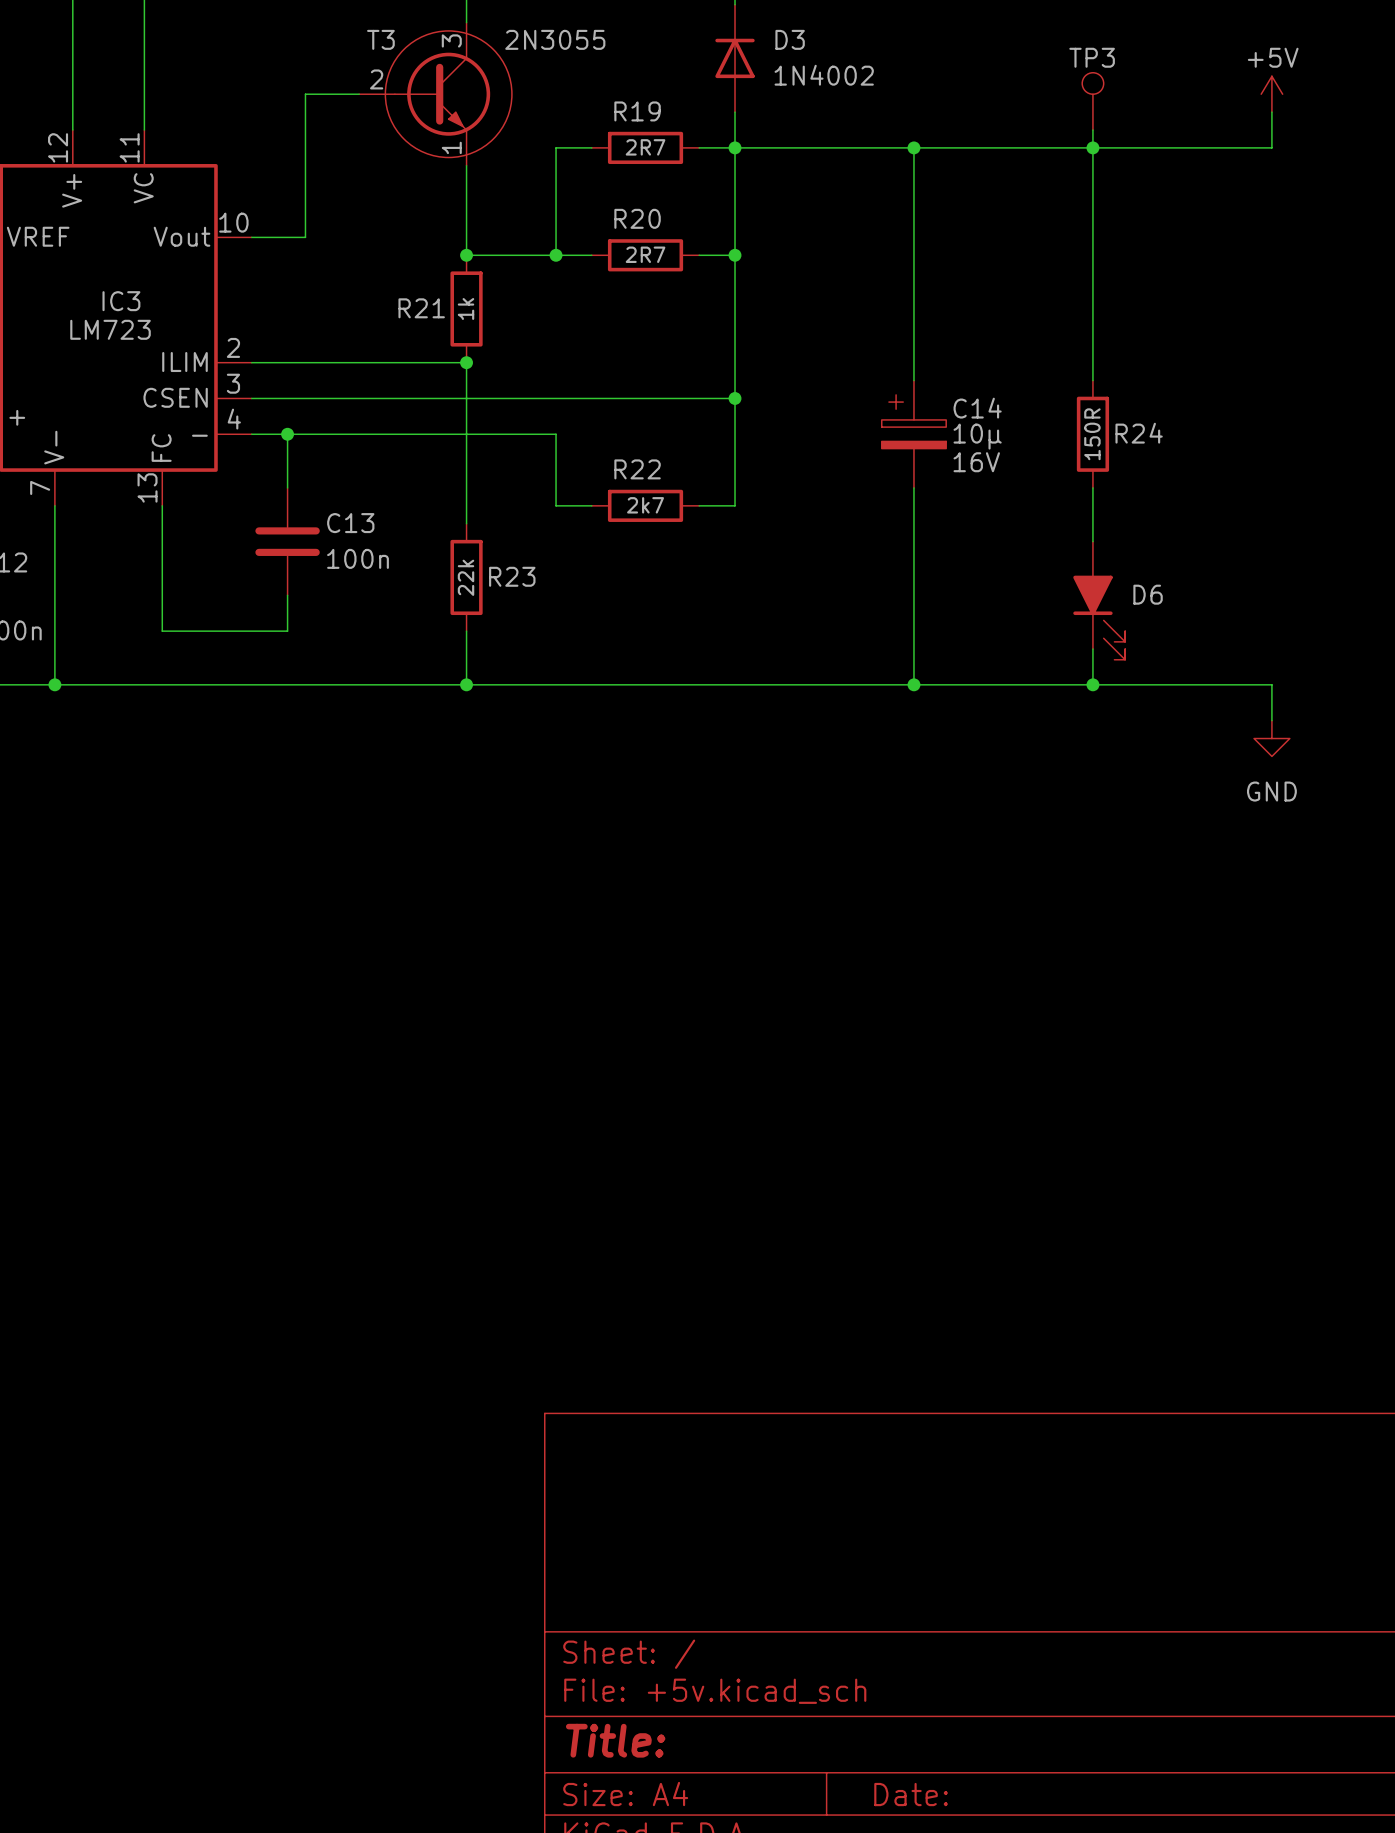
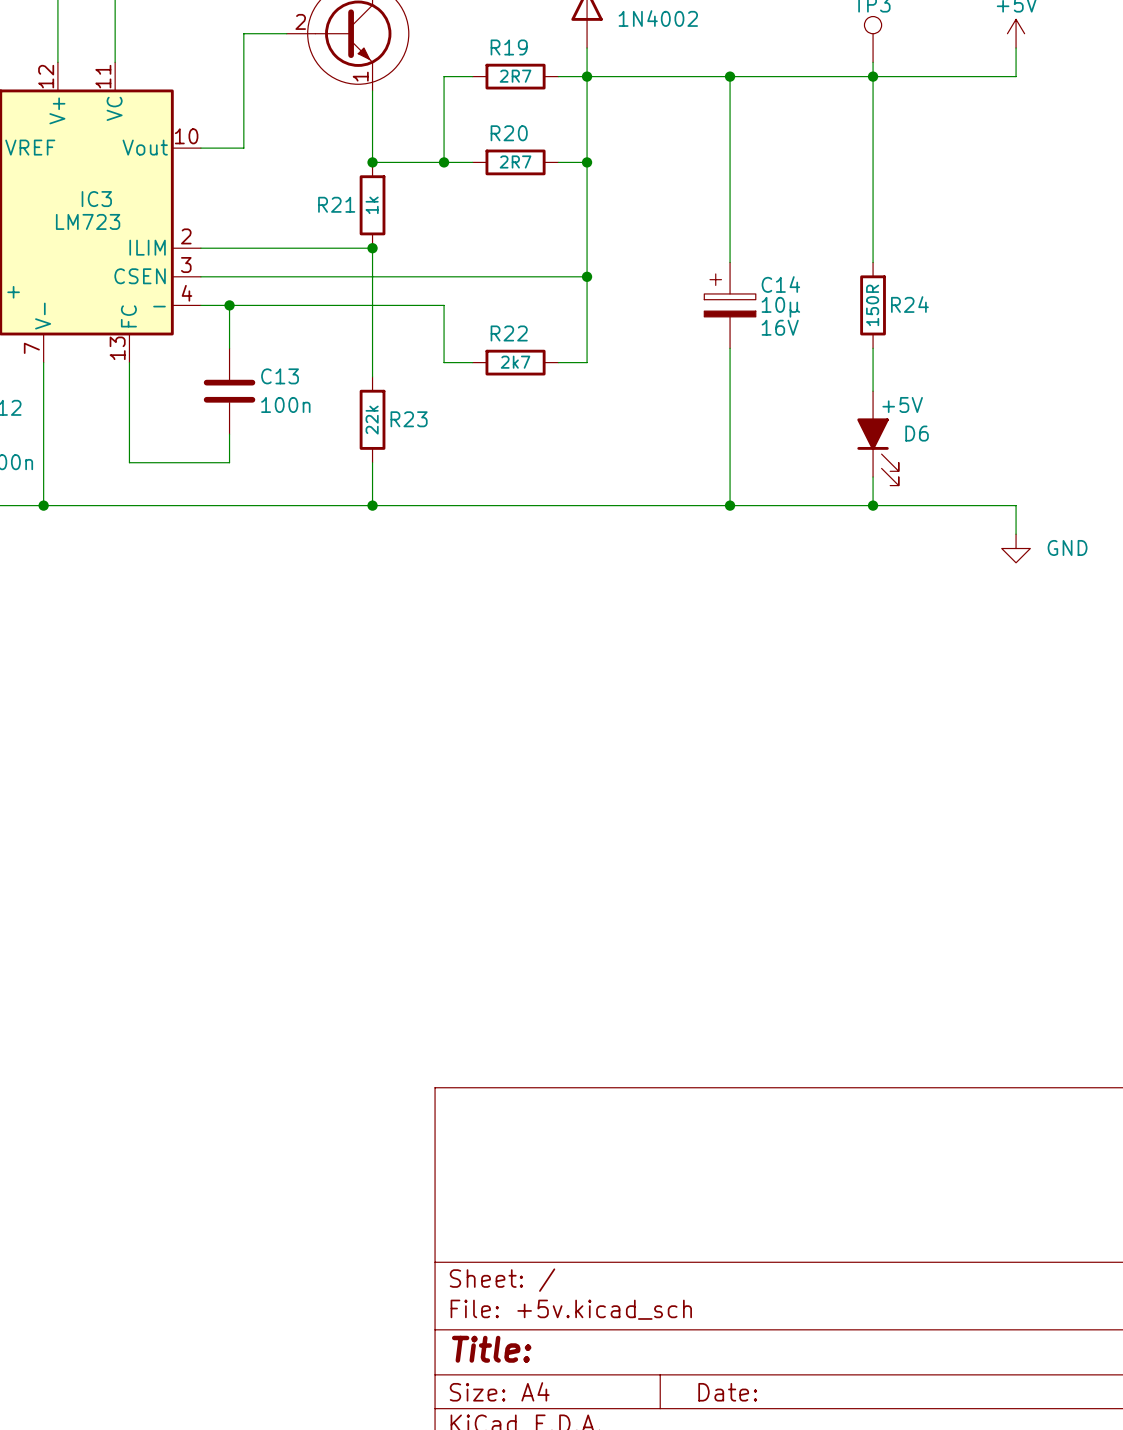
D6 text: none -> +5V (902, 404)
power symbol text position: GND (1271, 791) -> GND (1067, 547)

